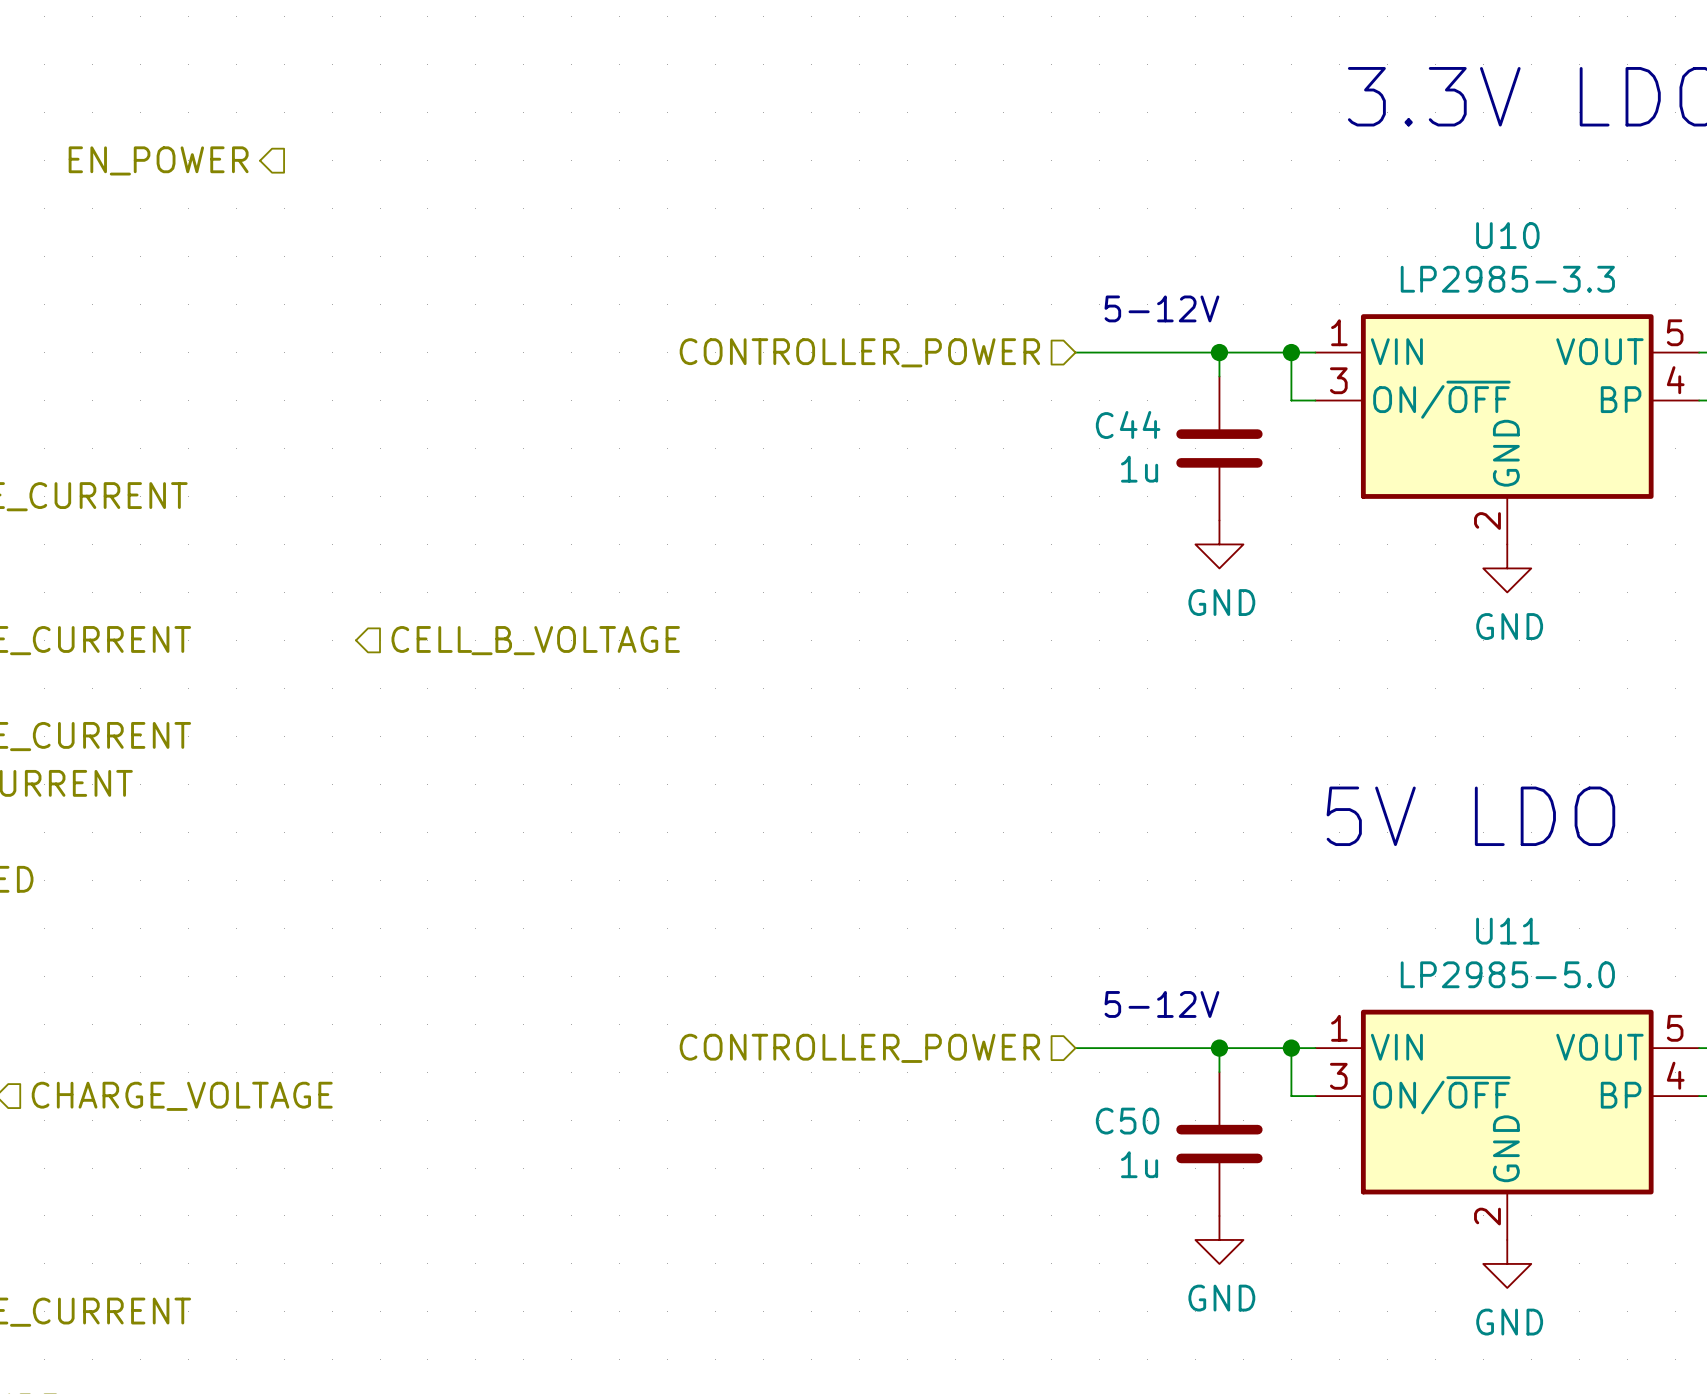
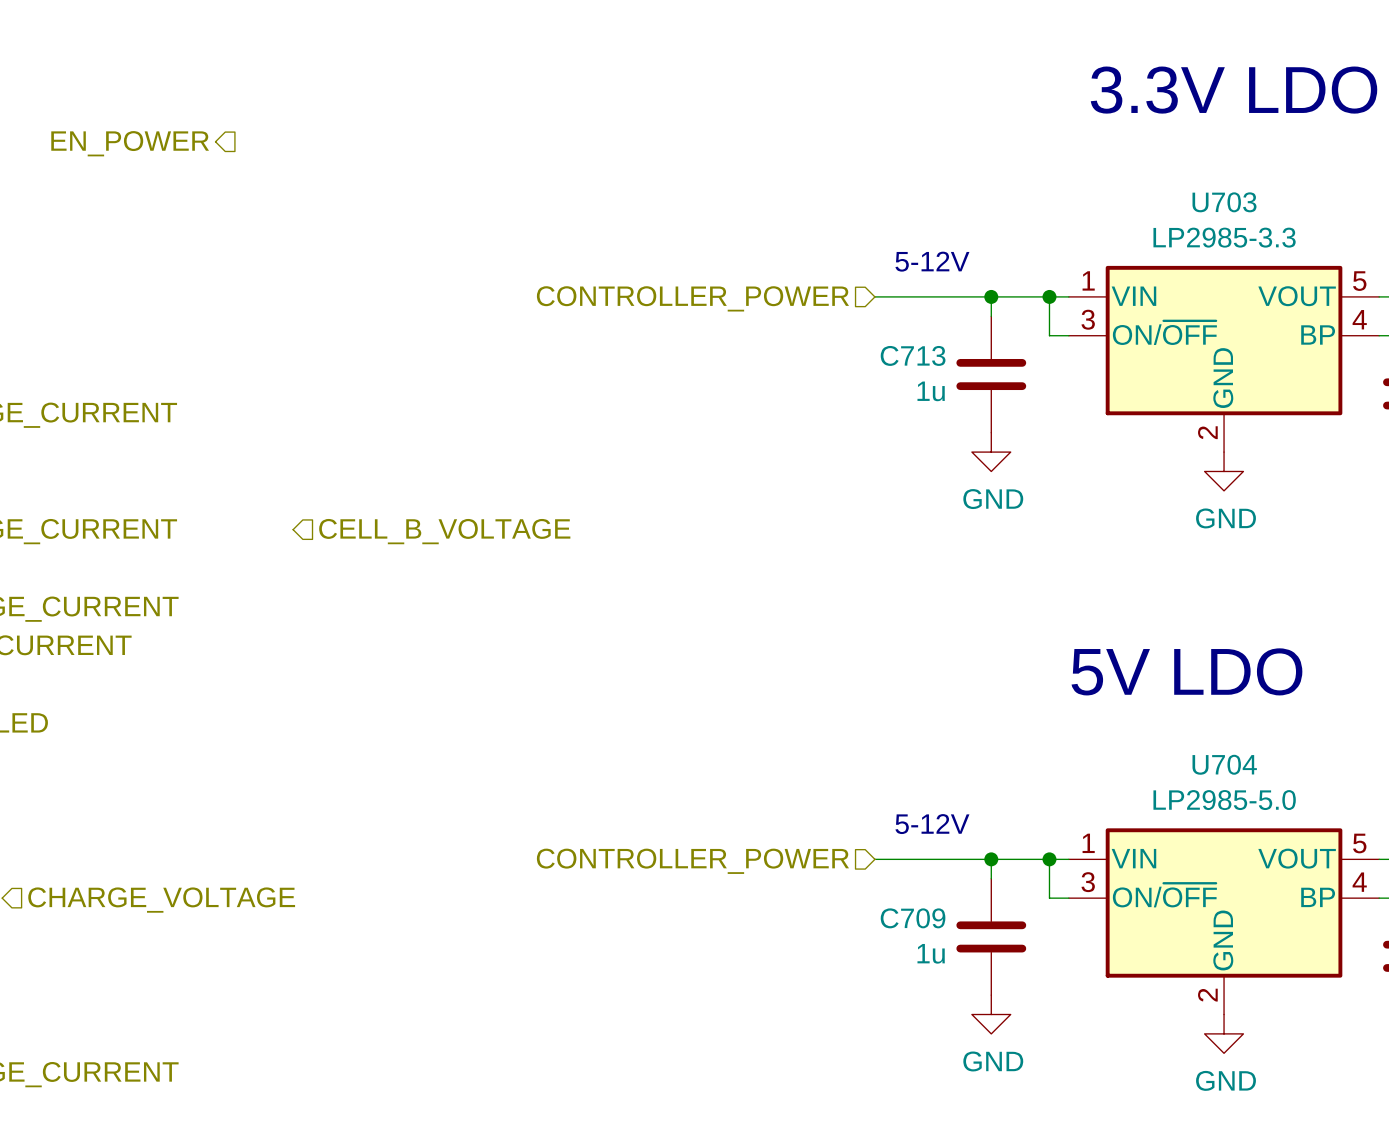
U10 name: U10 (1507, 235) -> U703 (1224, 202)
C44 name: C44 (1128, 424) -> C713 (913, 355)
U11 name: U11 (1507, 931) -> U704 (1224, 764)
C50 name: C50 (1127, 1121) -> C709 (913, 918)

